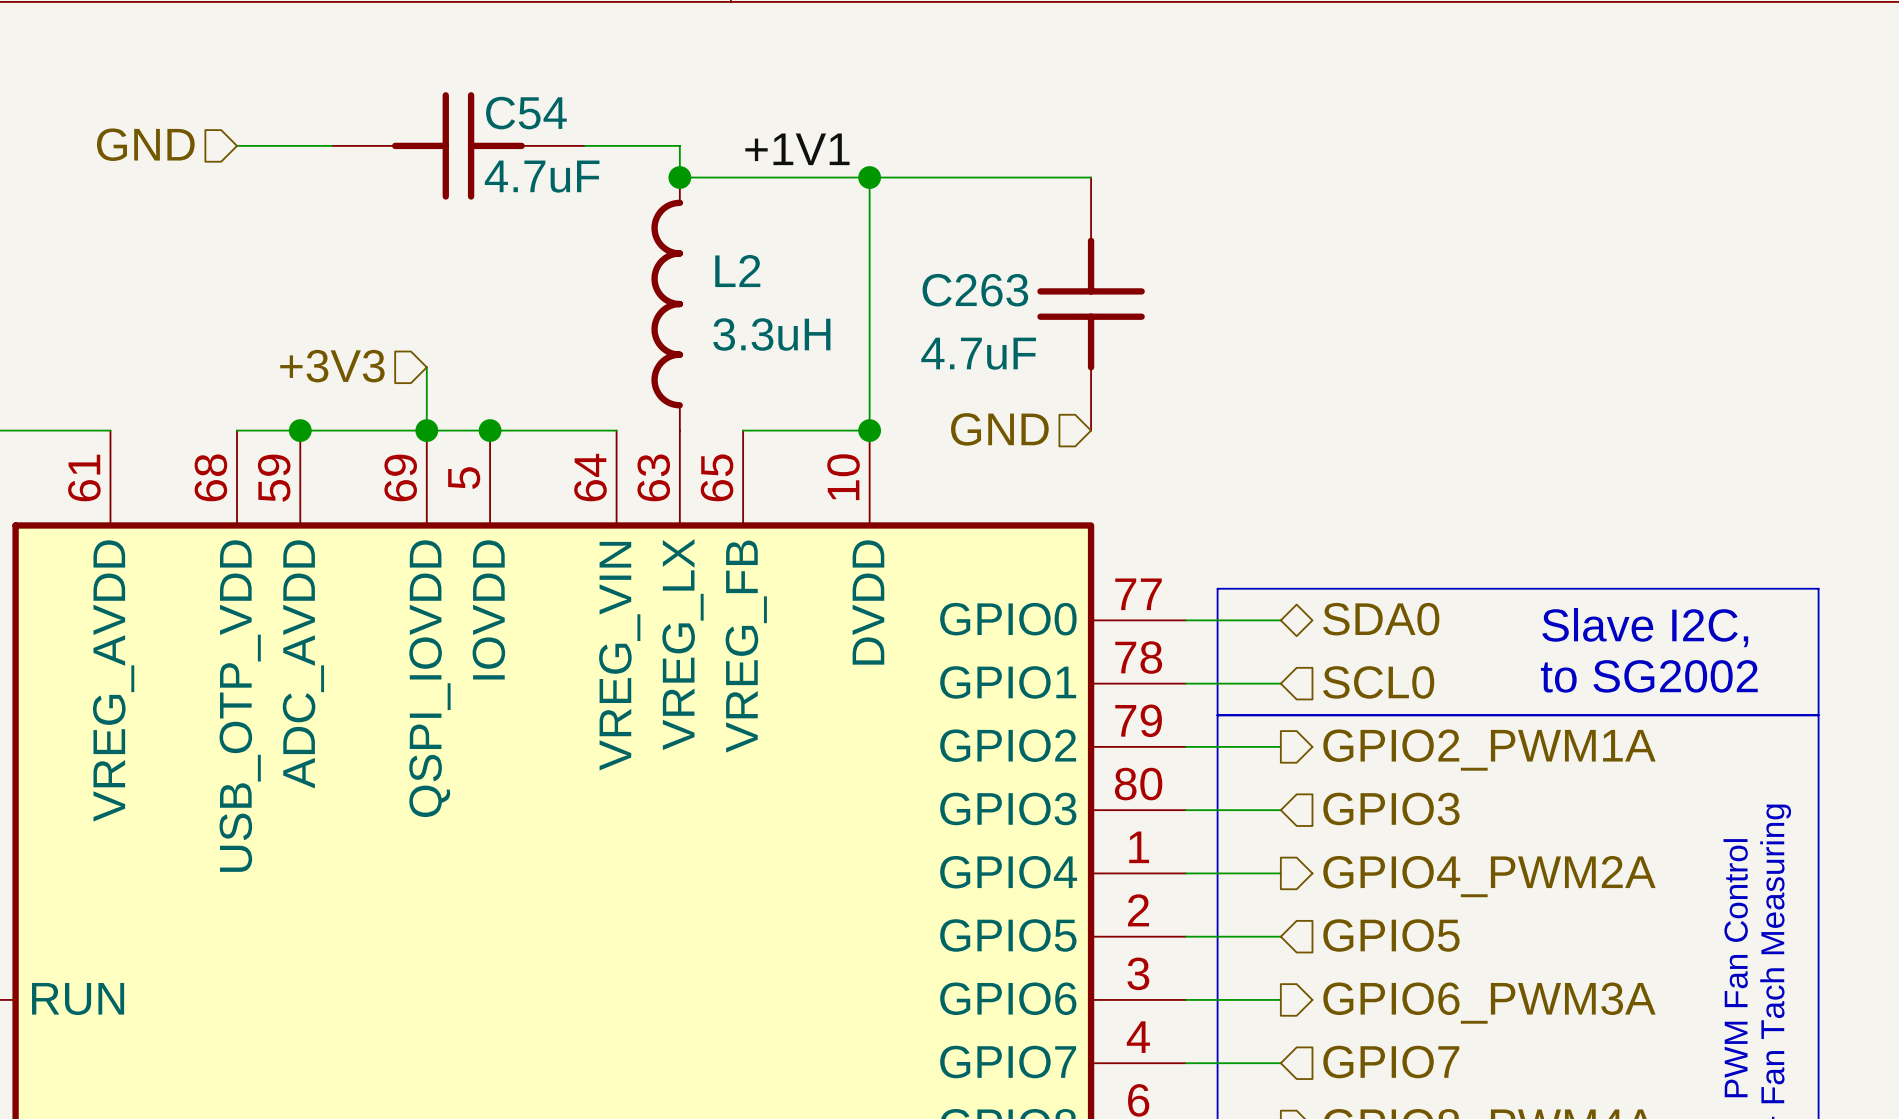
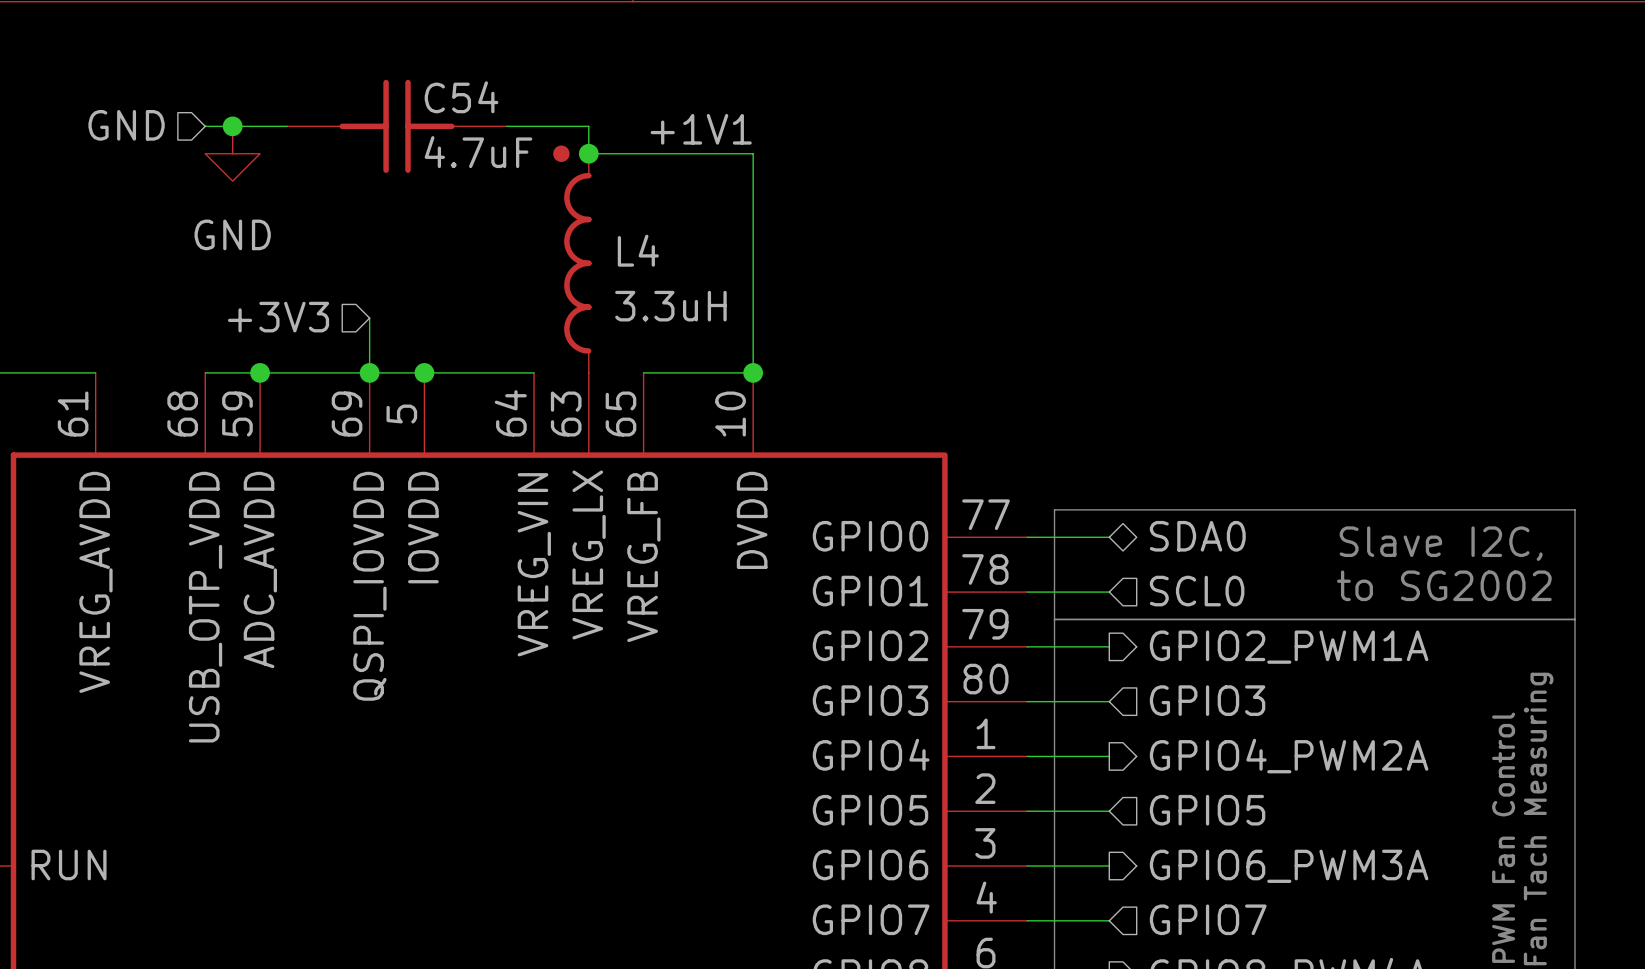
junction: none -> (232, 126)
power symbol: none -> GND (232, 153)
wire: (869, 177) (1091, 177) -> none
junction: (869, 177) -> none
L4: none -> 3.3uH (572, 259)
L2: 3.3uH (667, 304) -> none
C263: 4.7uF (1091, 304) -> none
hierarchical label: GND (999, 429) -> none

